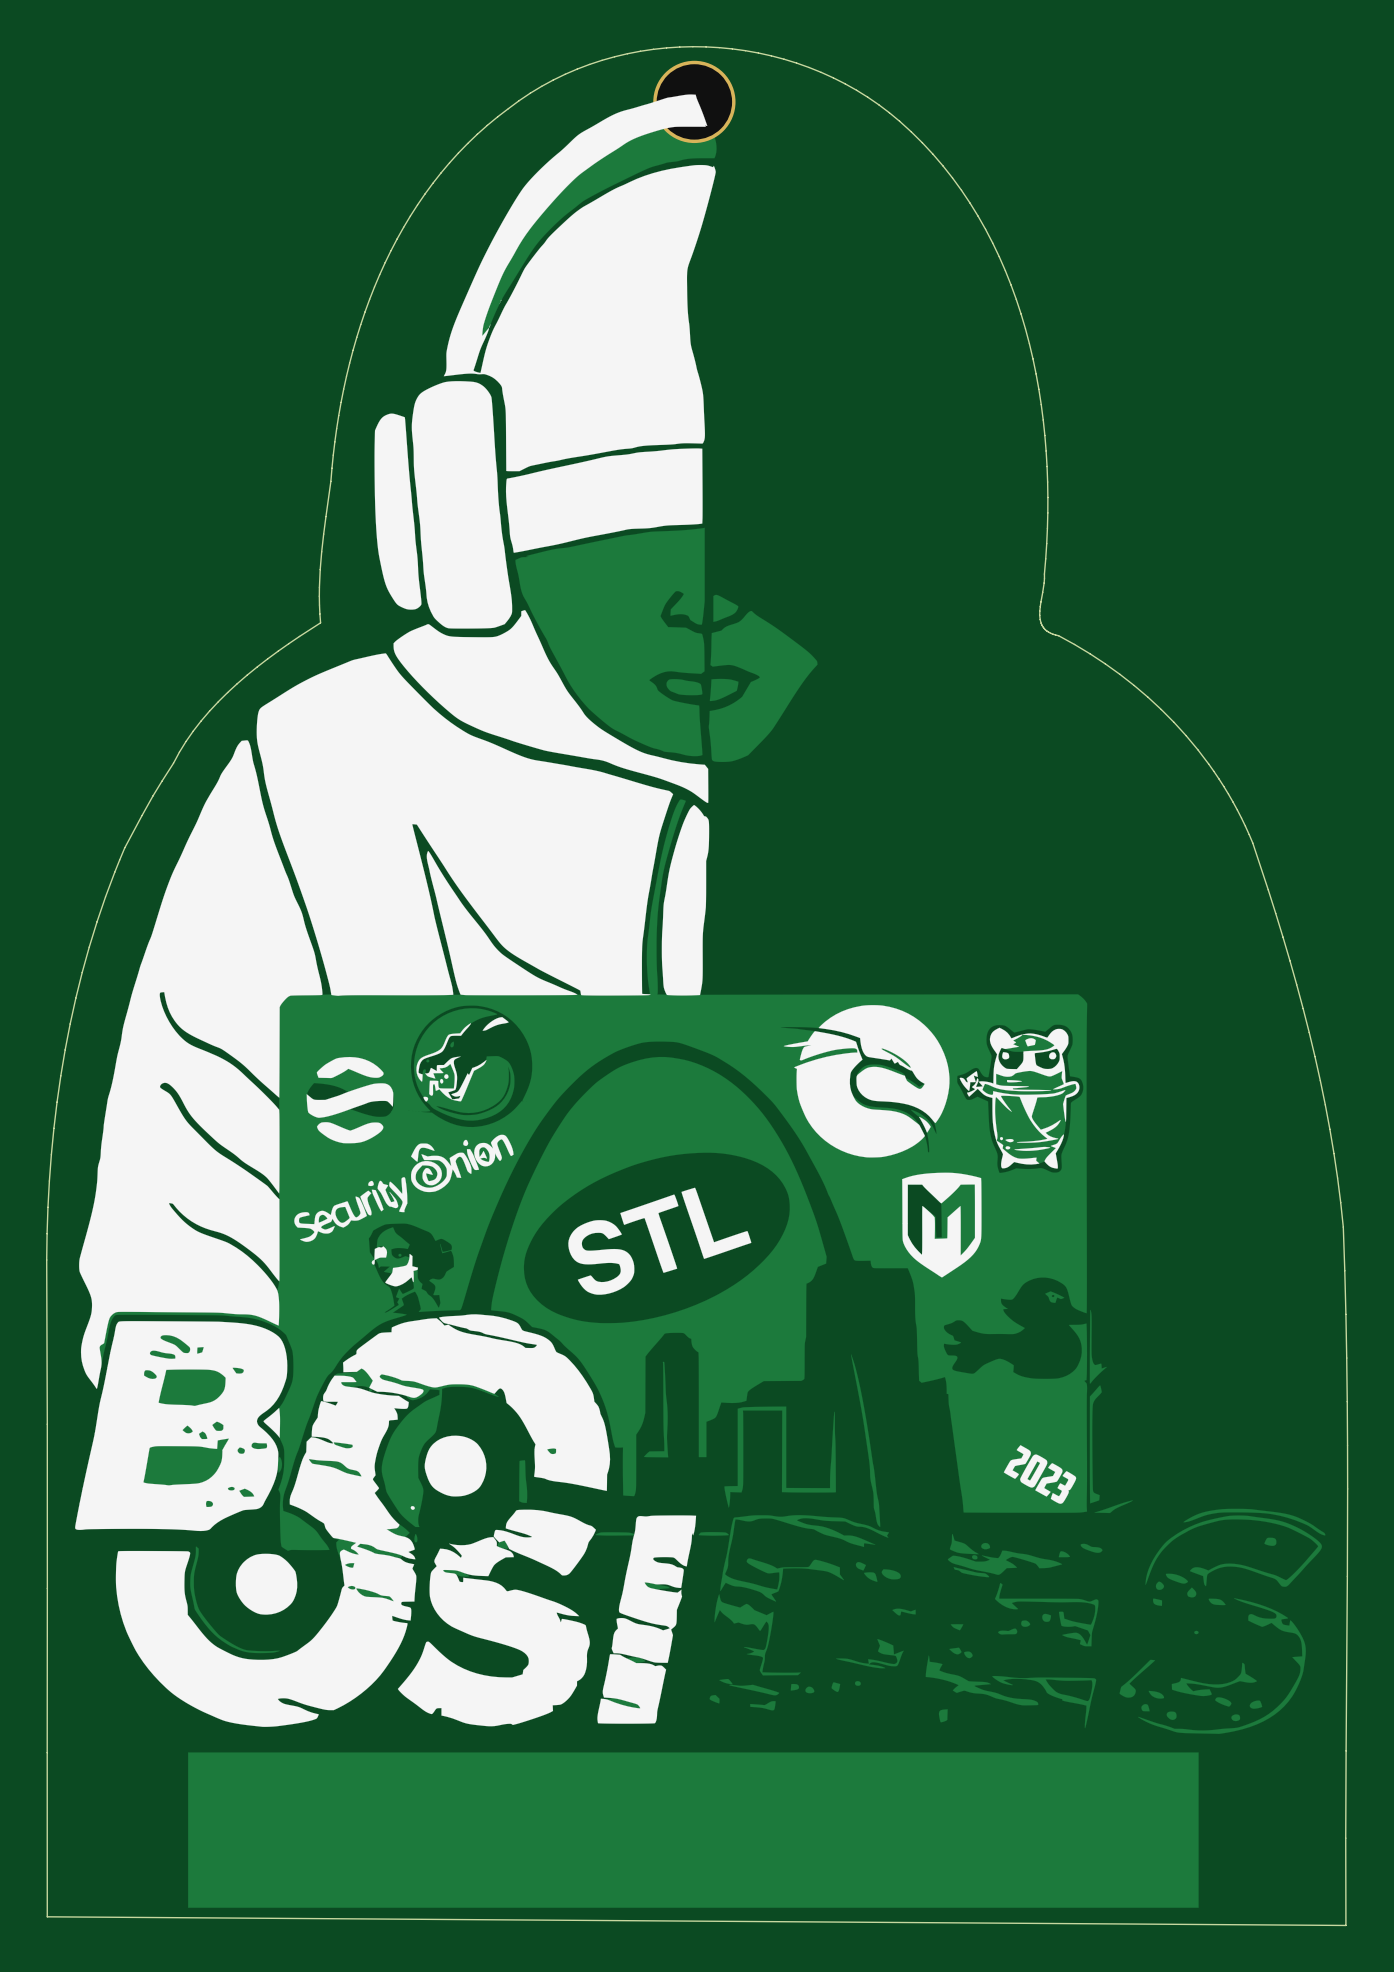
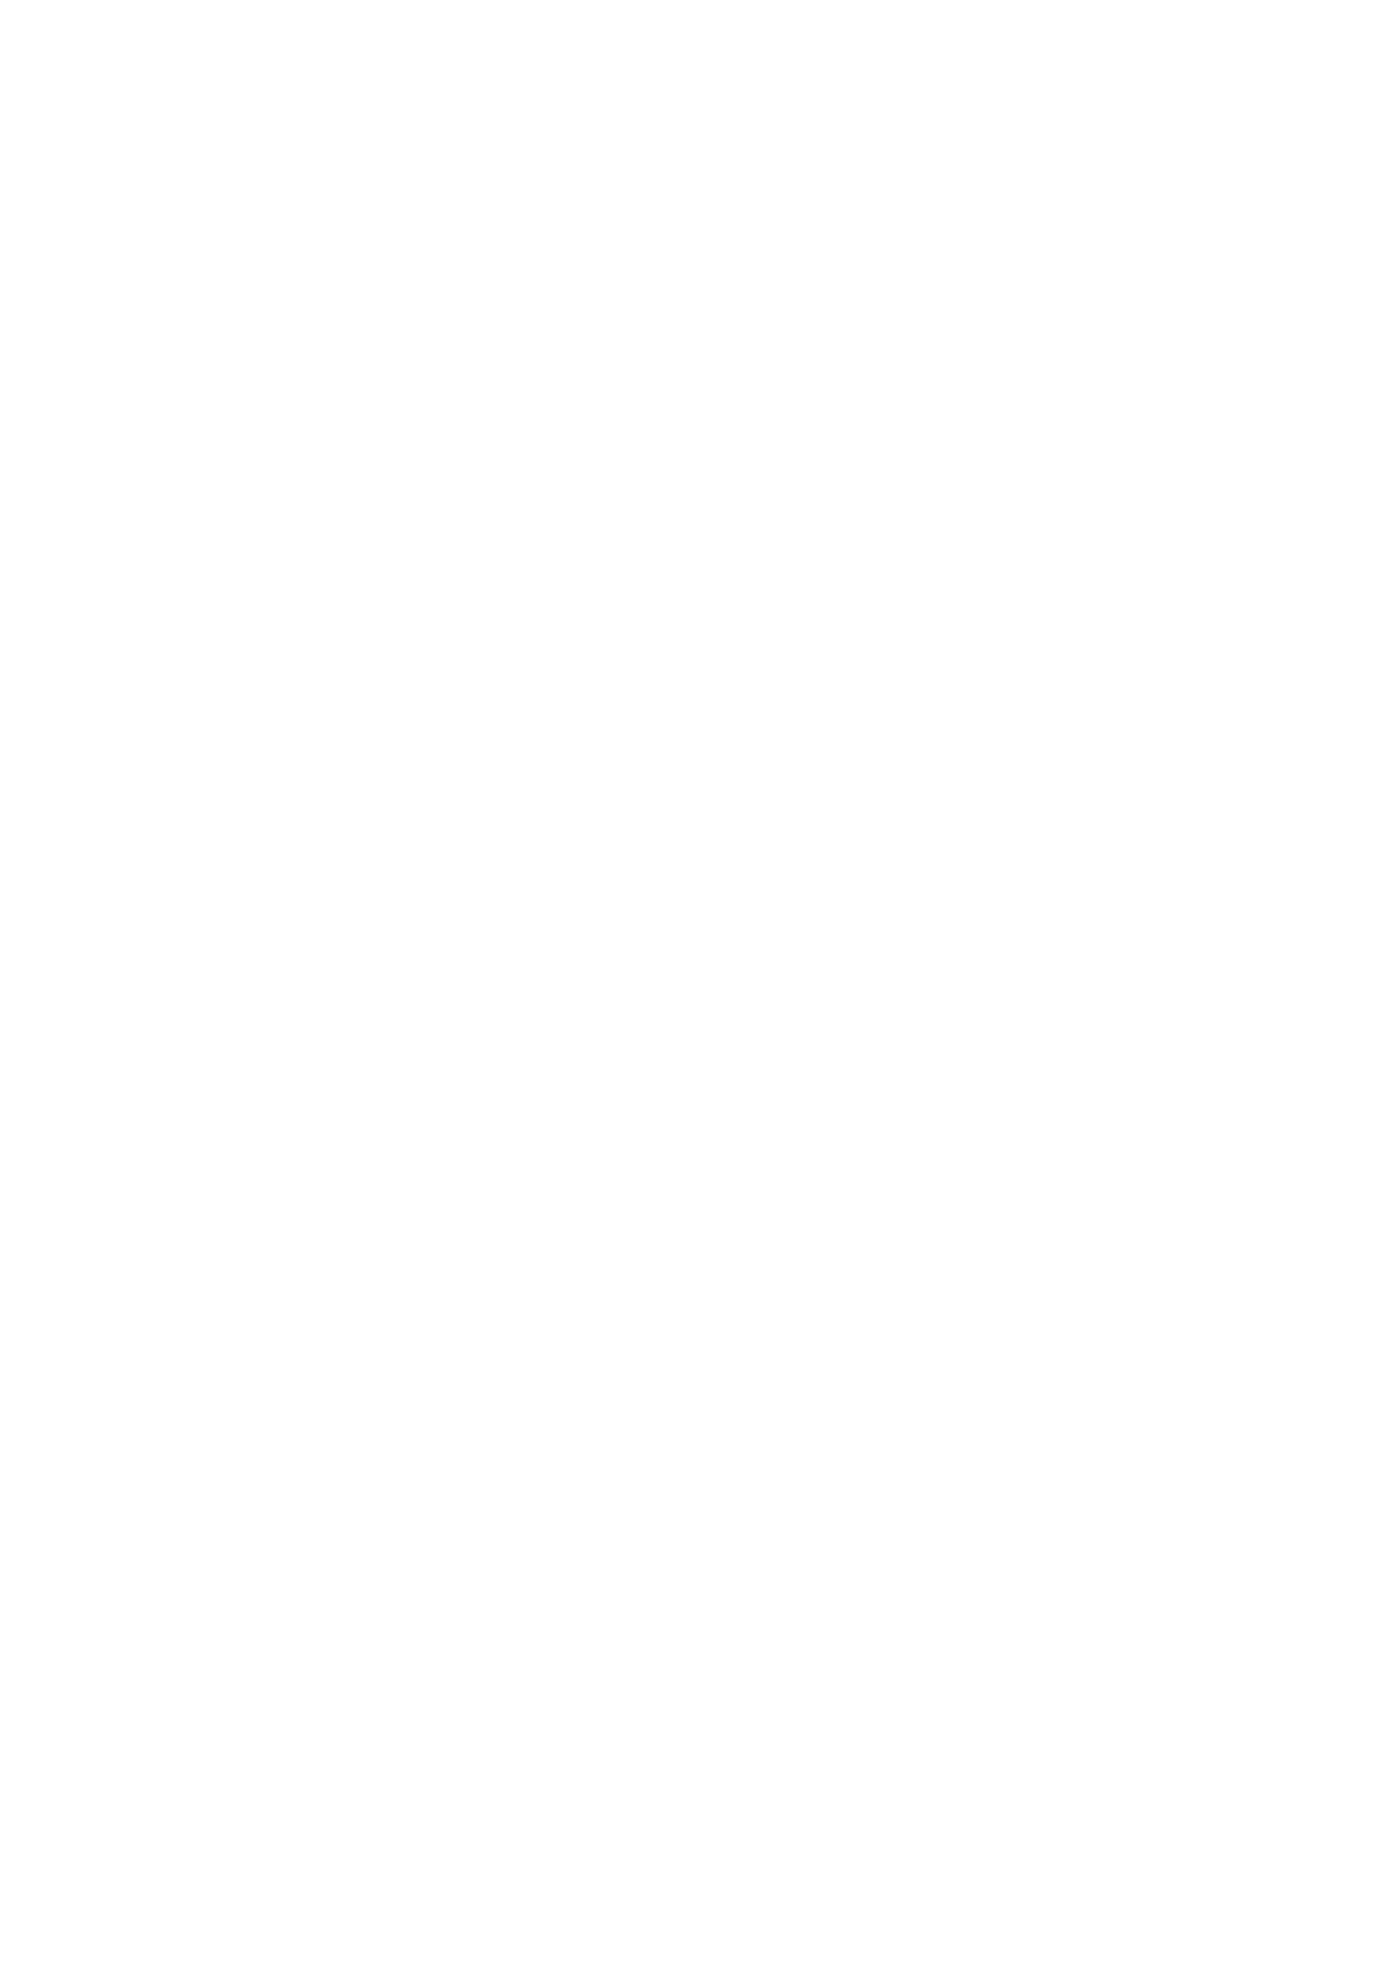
board edge: (692, 46) (732, 48) (771, 55) (809, 67) (845, 83) (878, 104) (911, 131) (932, 154) (961, 190) (985, 229) (1005, 270) (1021, 314) (1036, 374) (1043, 420) (1047, 482) (1046, 543) (1039, 611) (1041, 625) (1048, 632) (1074, 644) (1119, 674) (1148, 697) (1174, 722) (1197, 749) (1218, 778) (1237, 810) (1252, 843) (1289, 960) (1314, 1056) (1333, 1153) (1343, 1227) (1347, 1445) (1345, 1925) (47, 1916) (46, 1259) (49, 1180) (57, 1102) (70, 1023) (89, 947) (105, 896) (124, 847) (141, 815) (186, 741) (201, 720) (247, 675) (278, 651) (320, 622) (319, 587) (323, 534) (336, 428) (349, 363) (365, 311) (379, 274) (403, 227) (425, 194) (449, 162) (477, 134) (508, 108) (541, 86) (577, 69) (614, 56) (653, 49) (692, 46) -> none
drawing: [75, 94, 1326, 1908] -> none
part: (694, 101) -> none

